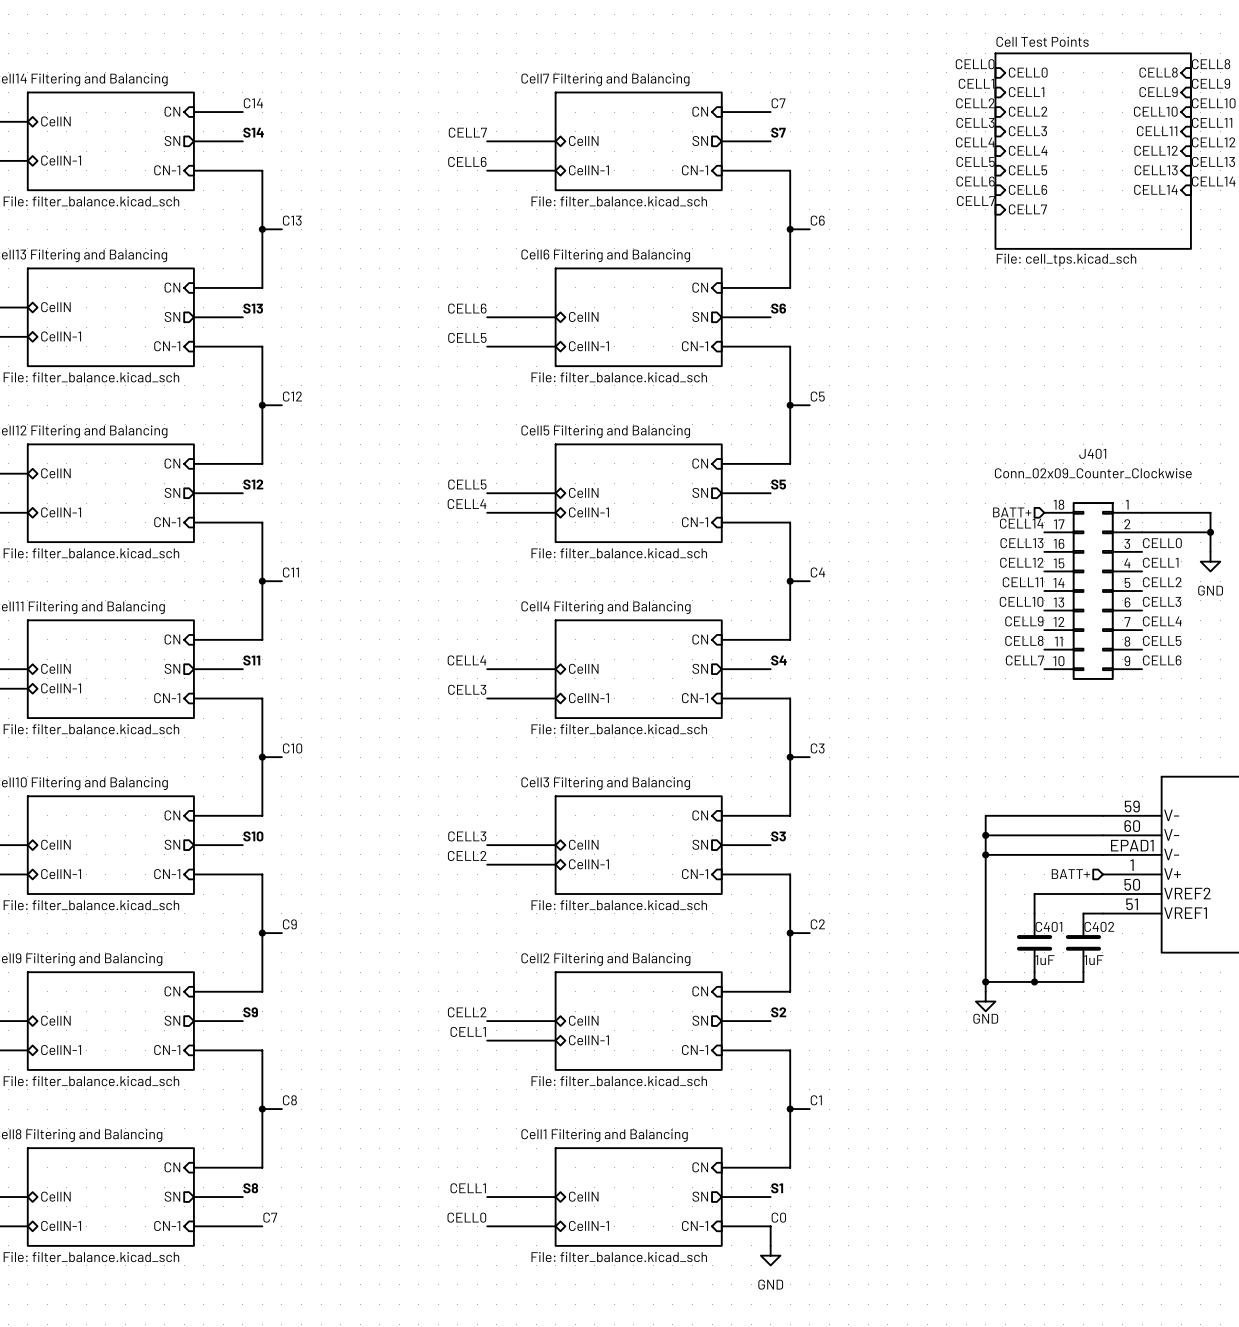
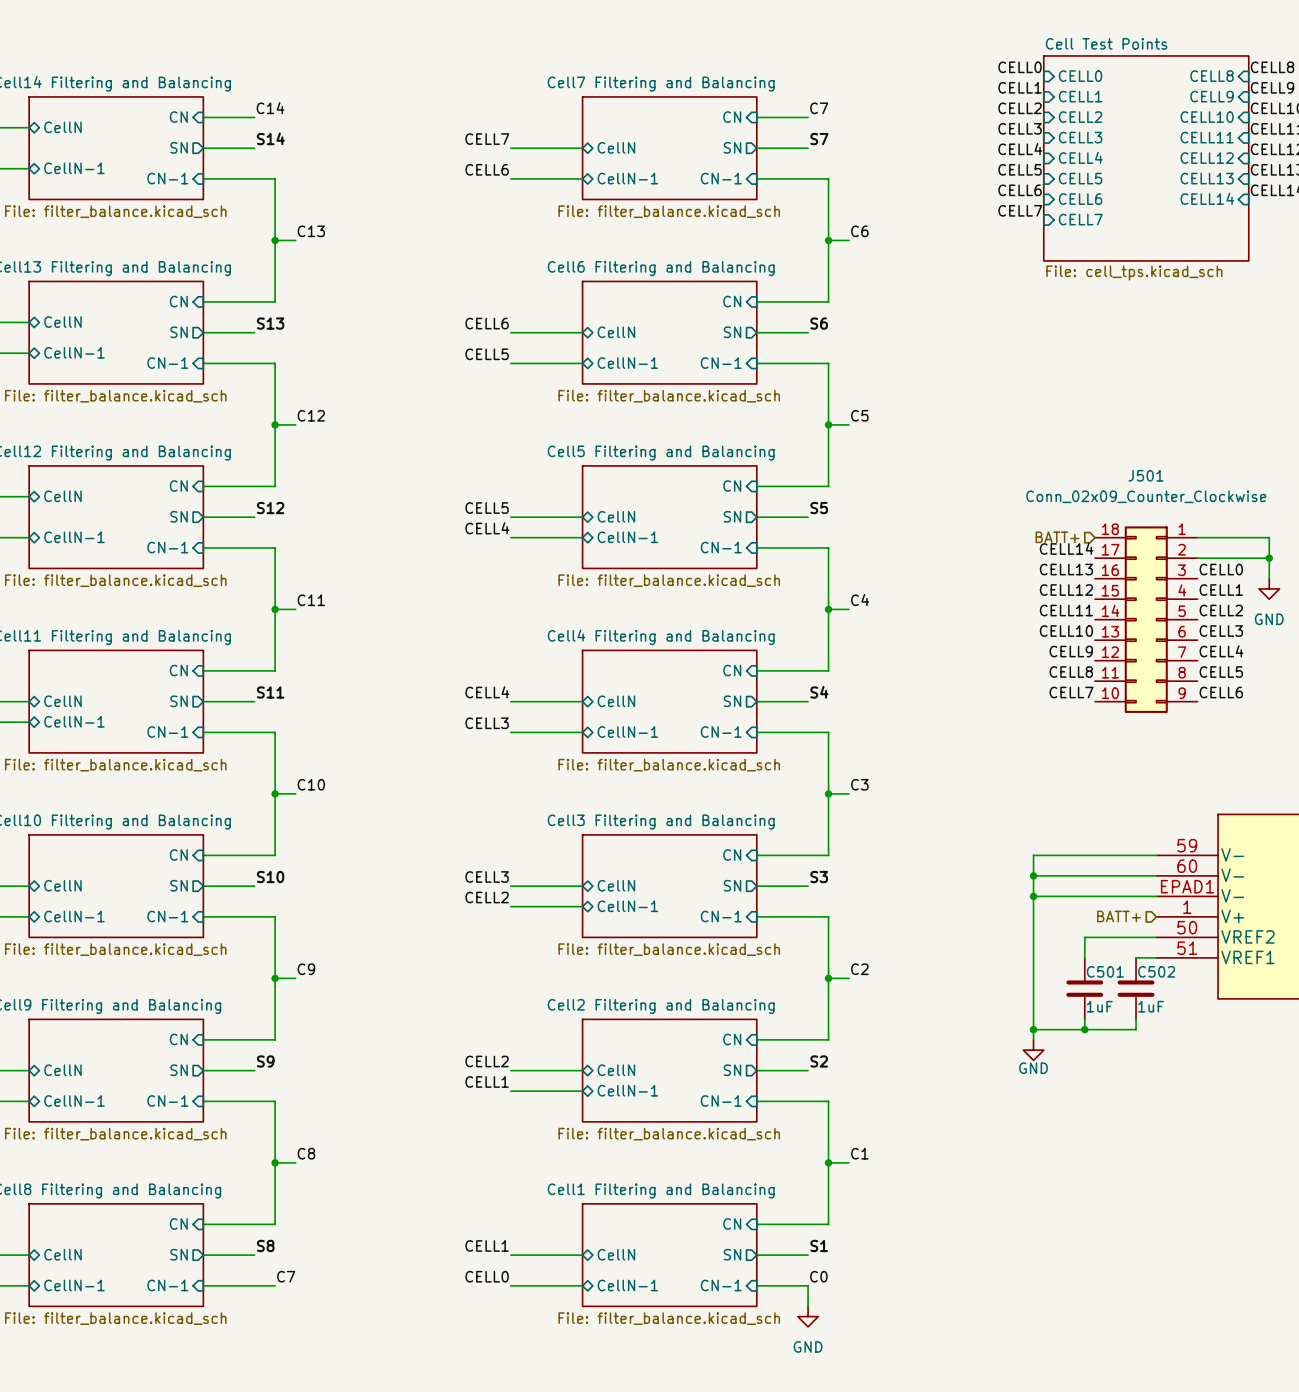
J401 name: J401 (1092, 453) -> J501 (1146, 475)
C401 name: C401 (1048, 926) -> C501 (1105, 971)
C402 name: C402 (1099, 926) -> C502 (1156, 971)

